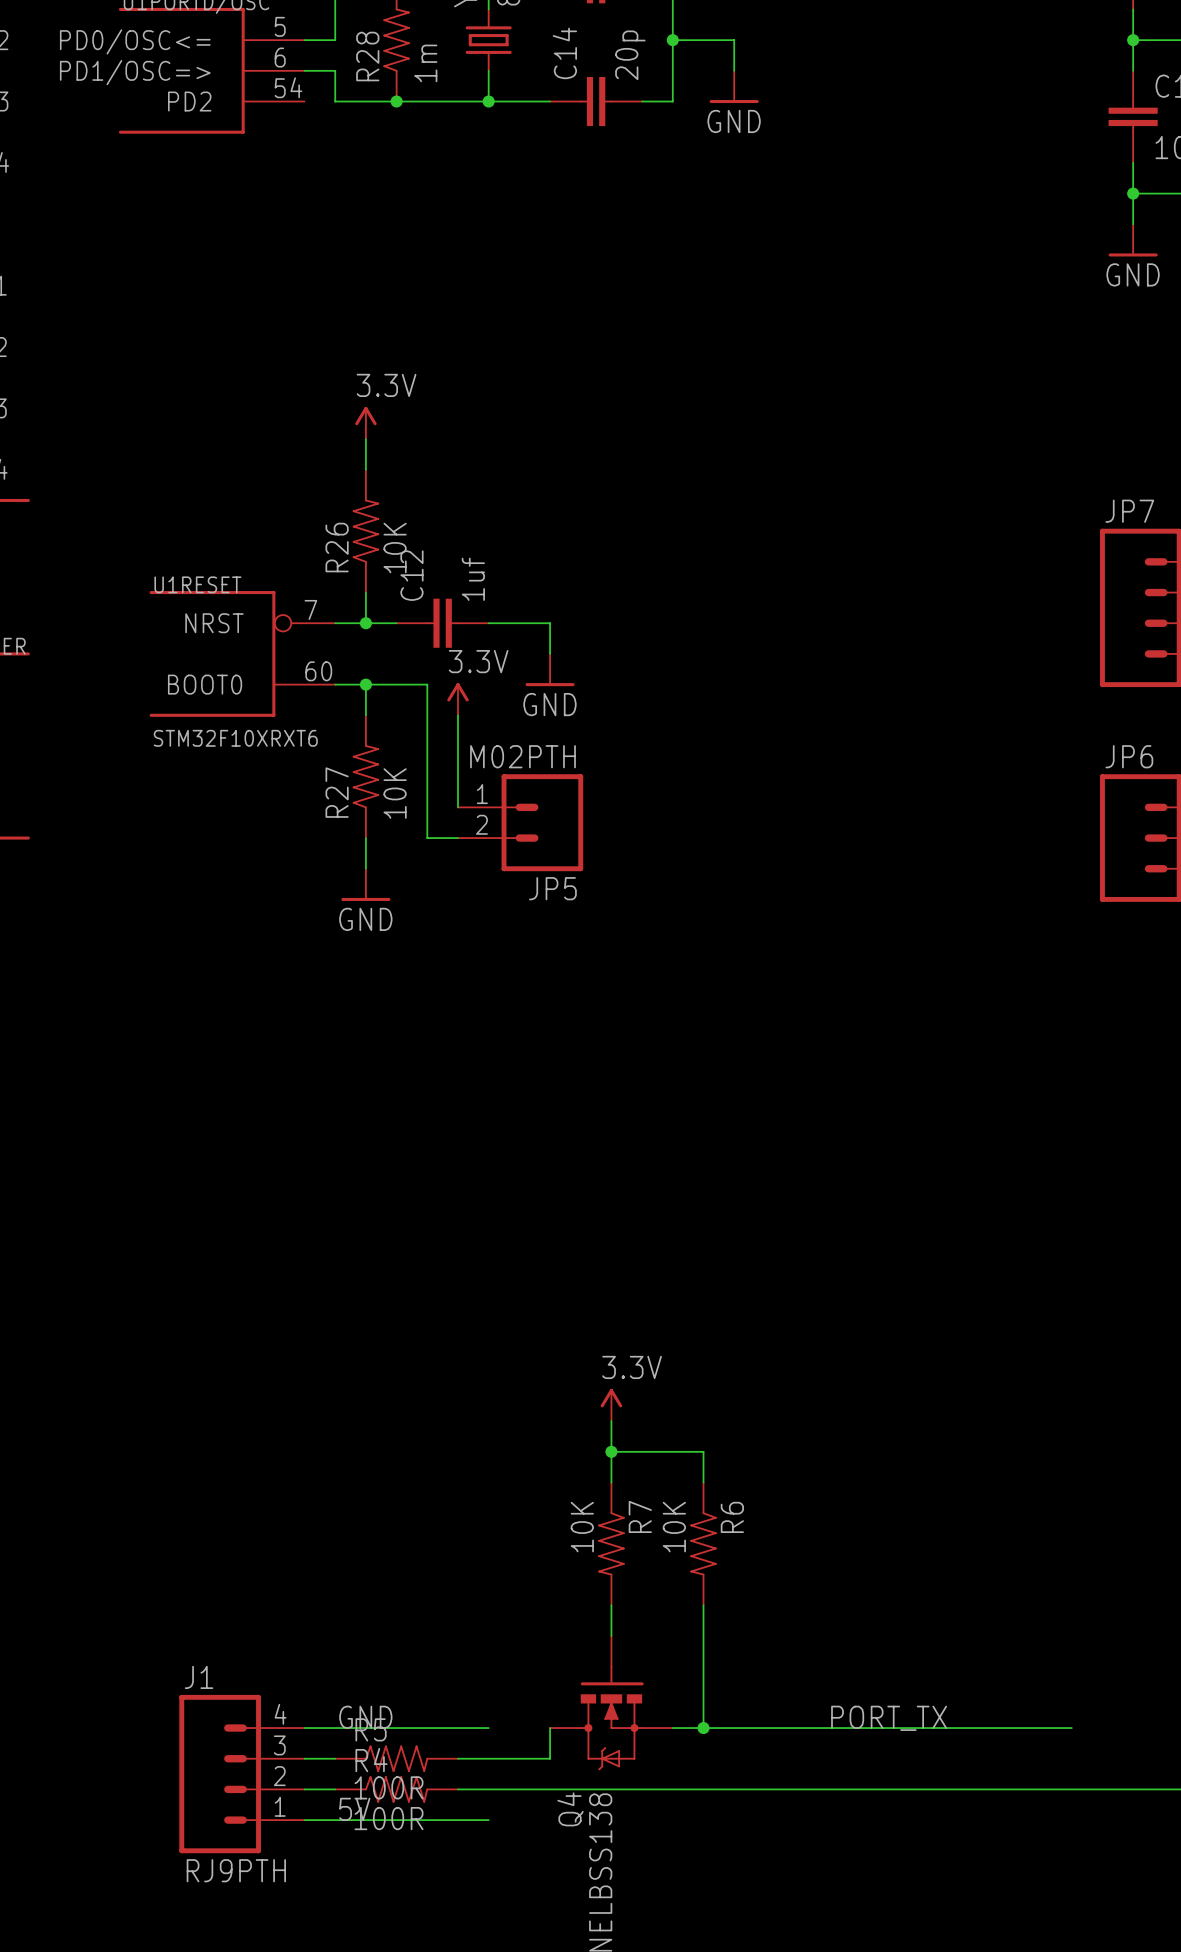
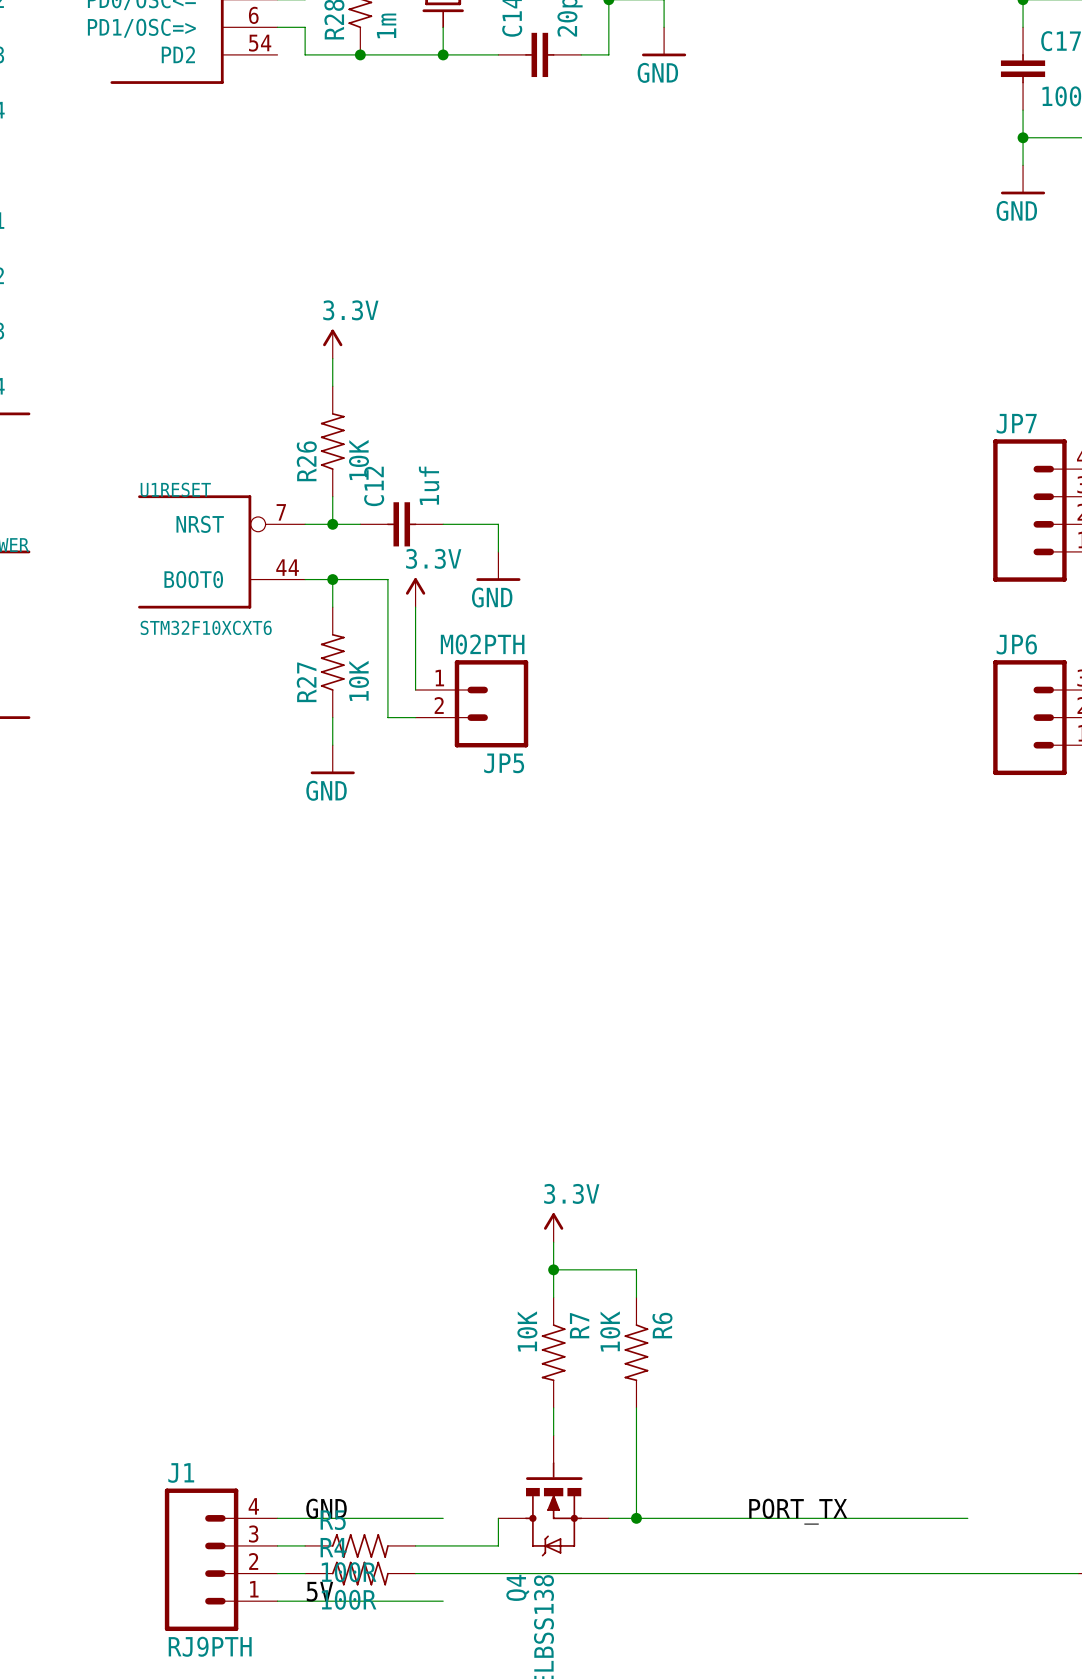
U1RESET pin number: 60 (318, 671) -> 44 (287, 567)
U1RESET value: STM32F10XRXT6 (235, 738) -> STM32F10XCXT6 (206, 627)

